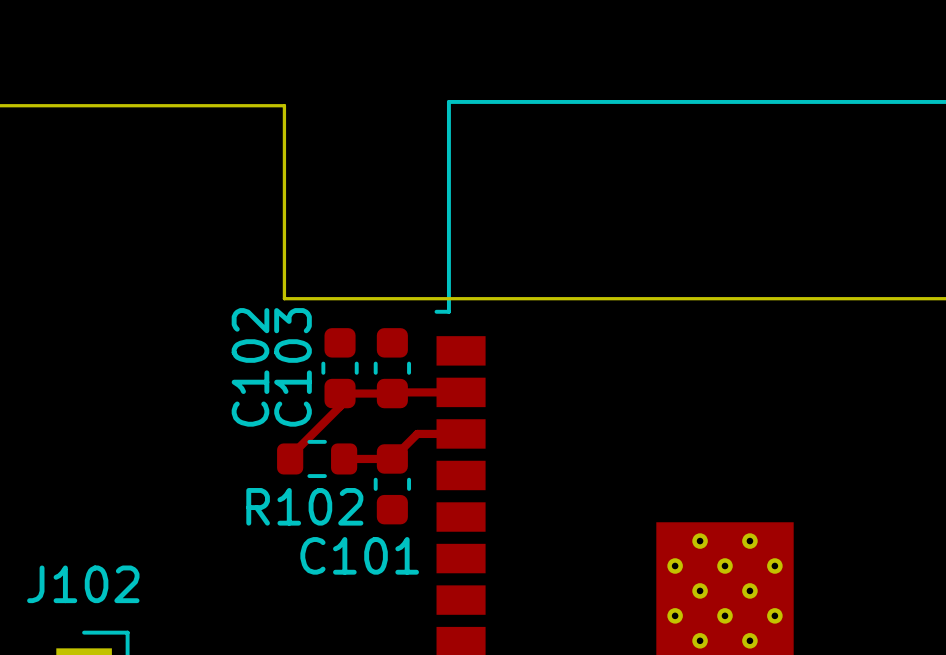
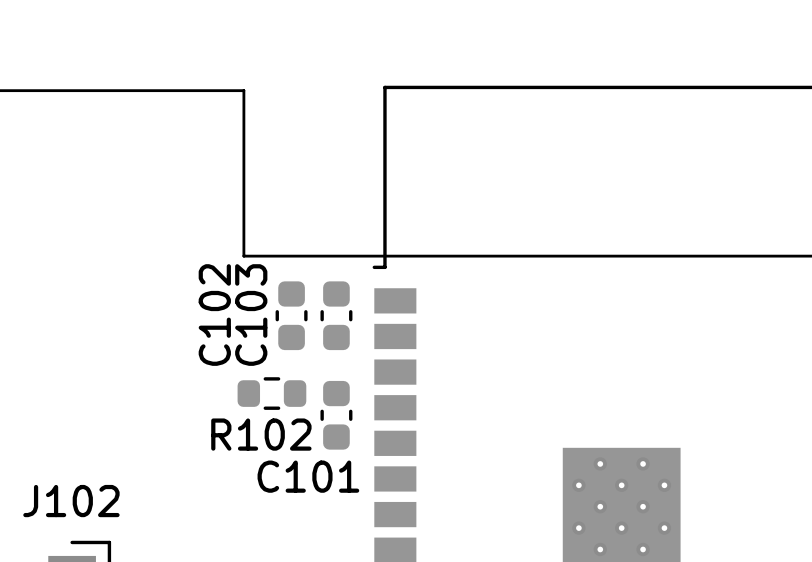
track: (461, 392) (340, 393) (340, 406) (290, 456) (290, 458) -> none
track: (461, 433) (417, 433) (392, 458) (344, 458) -> none

